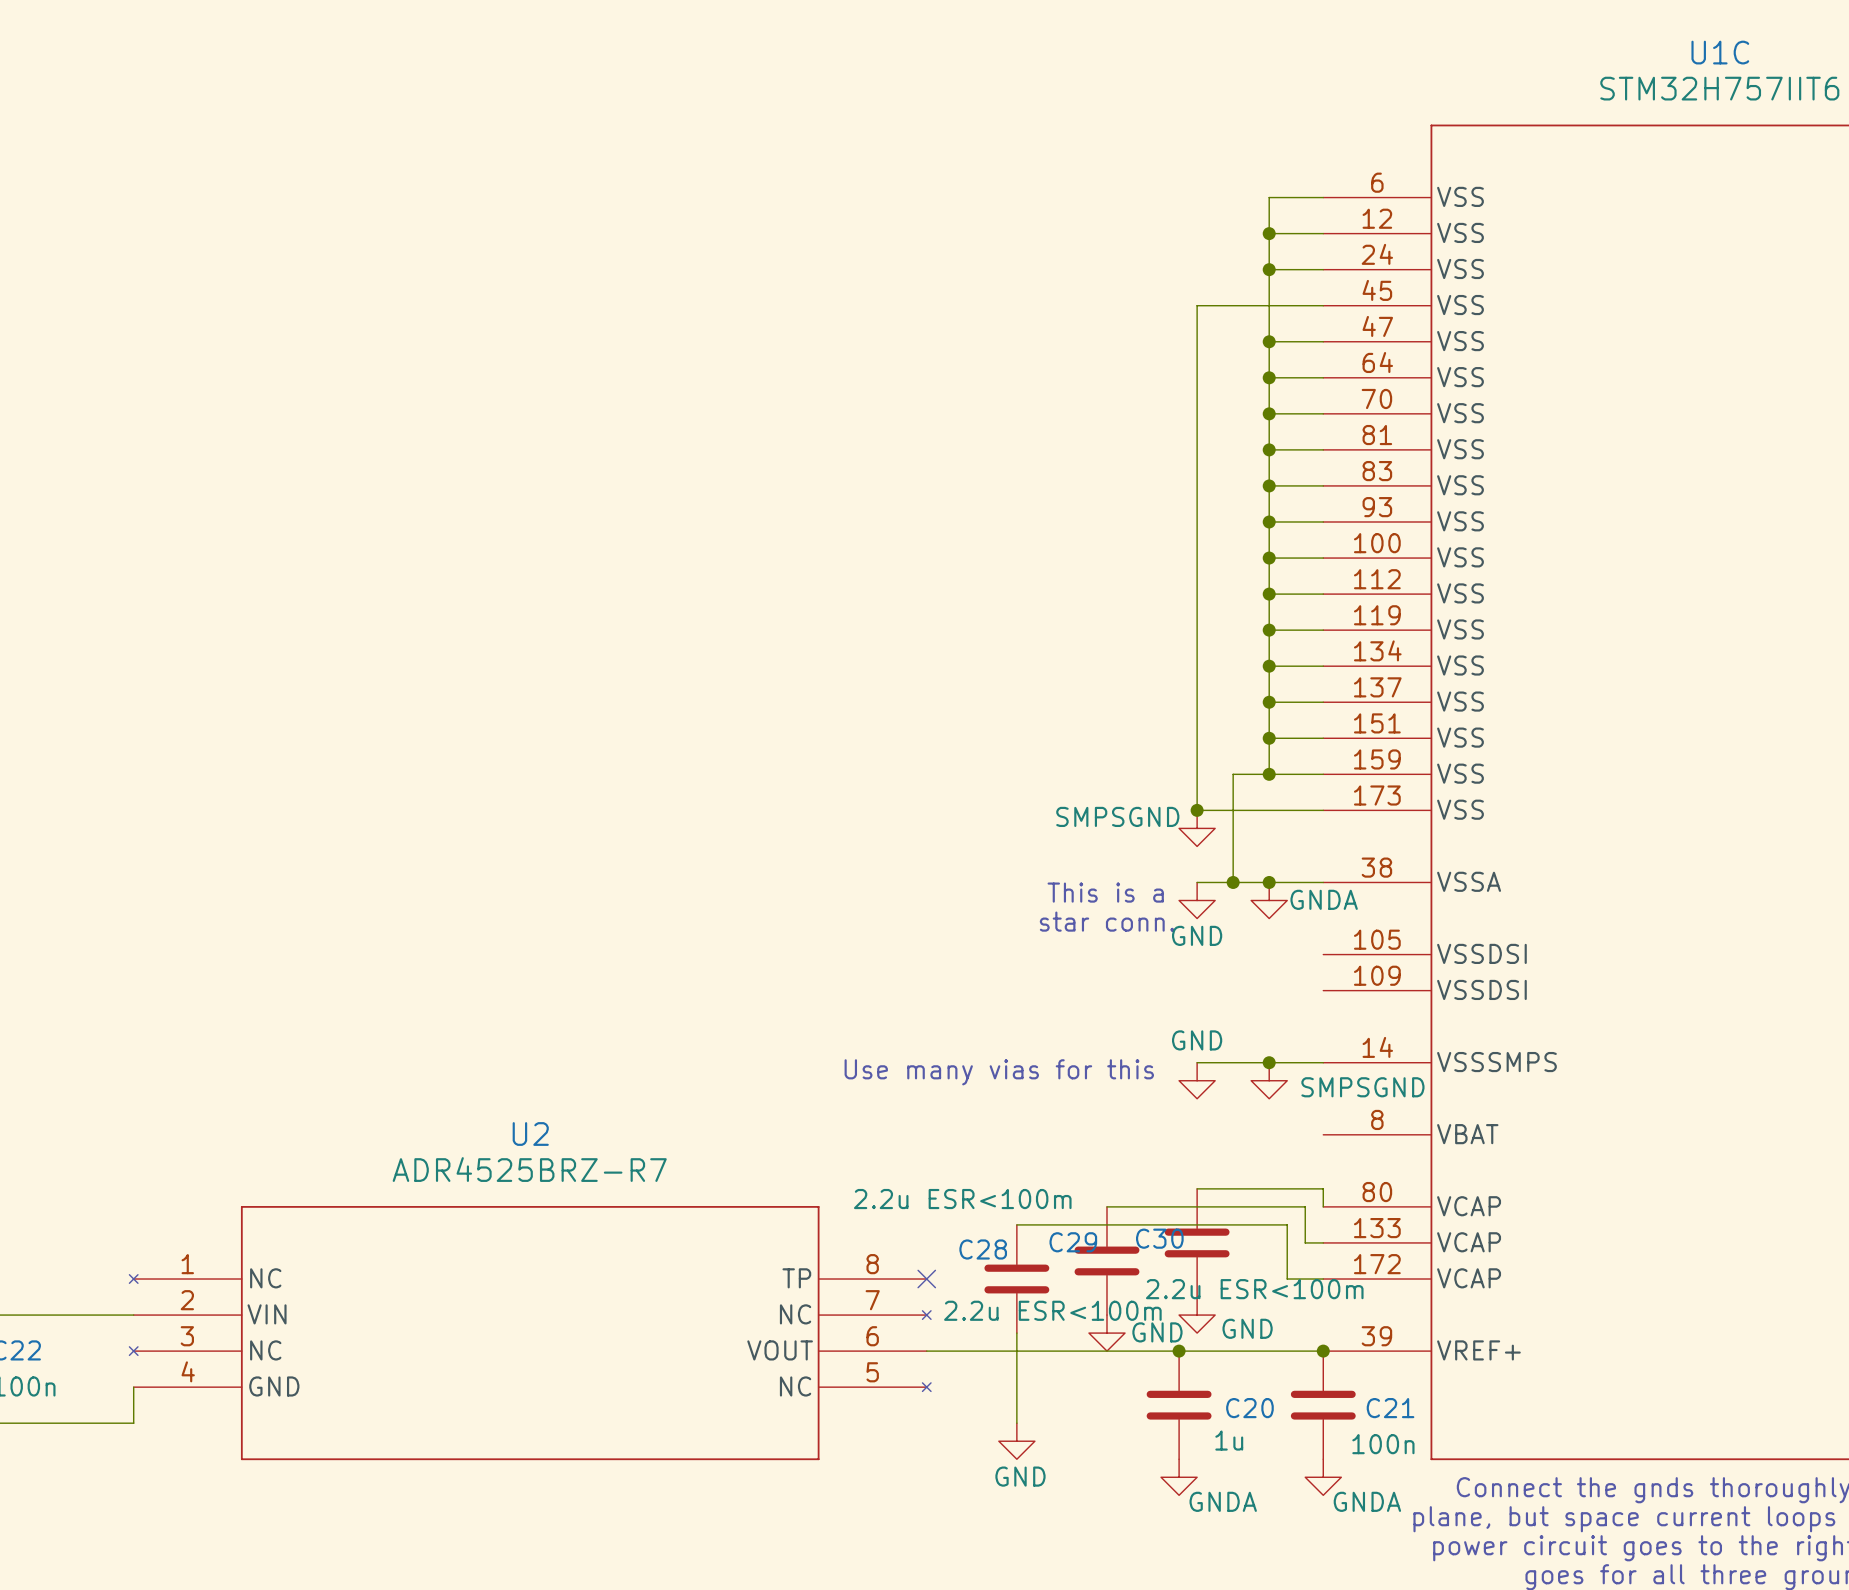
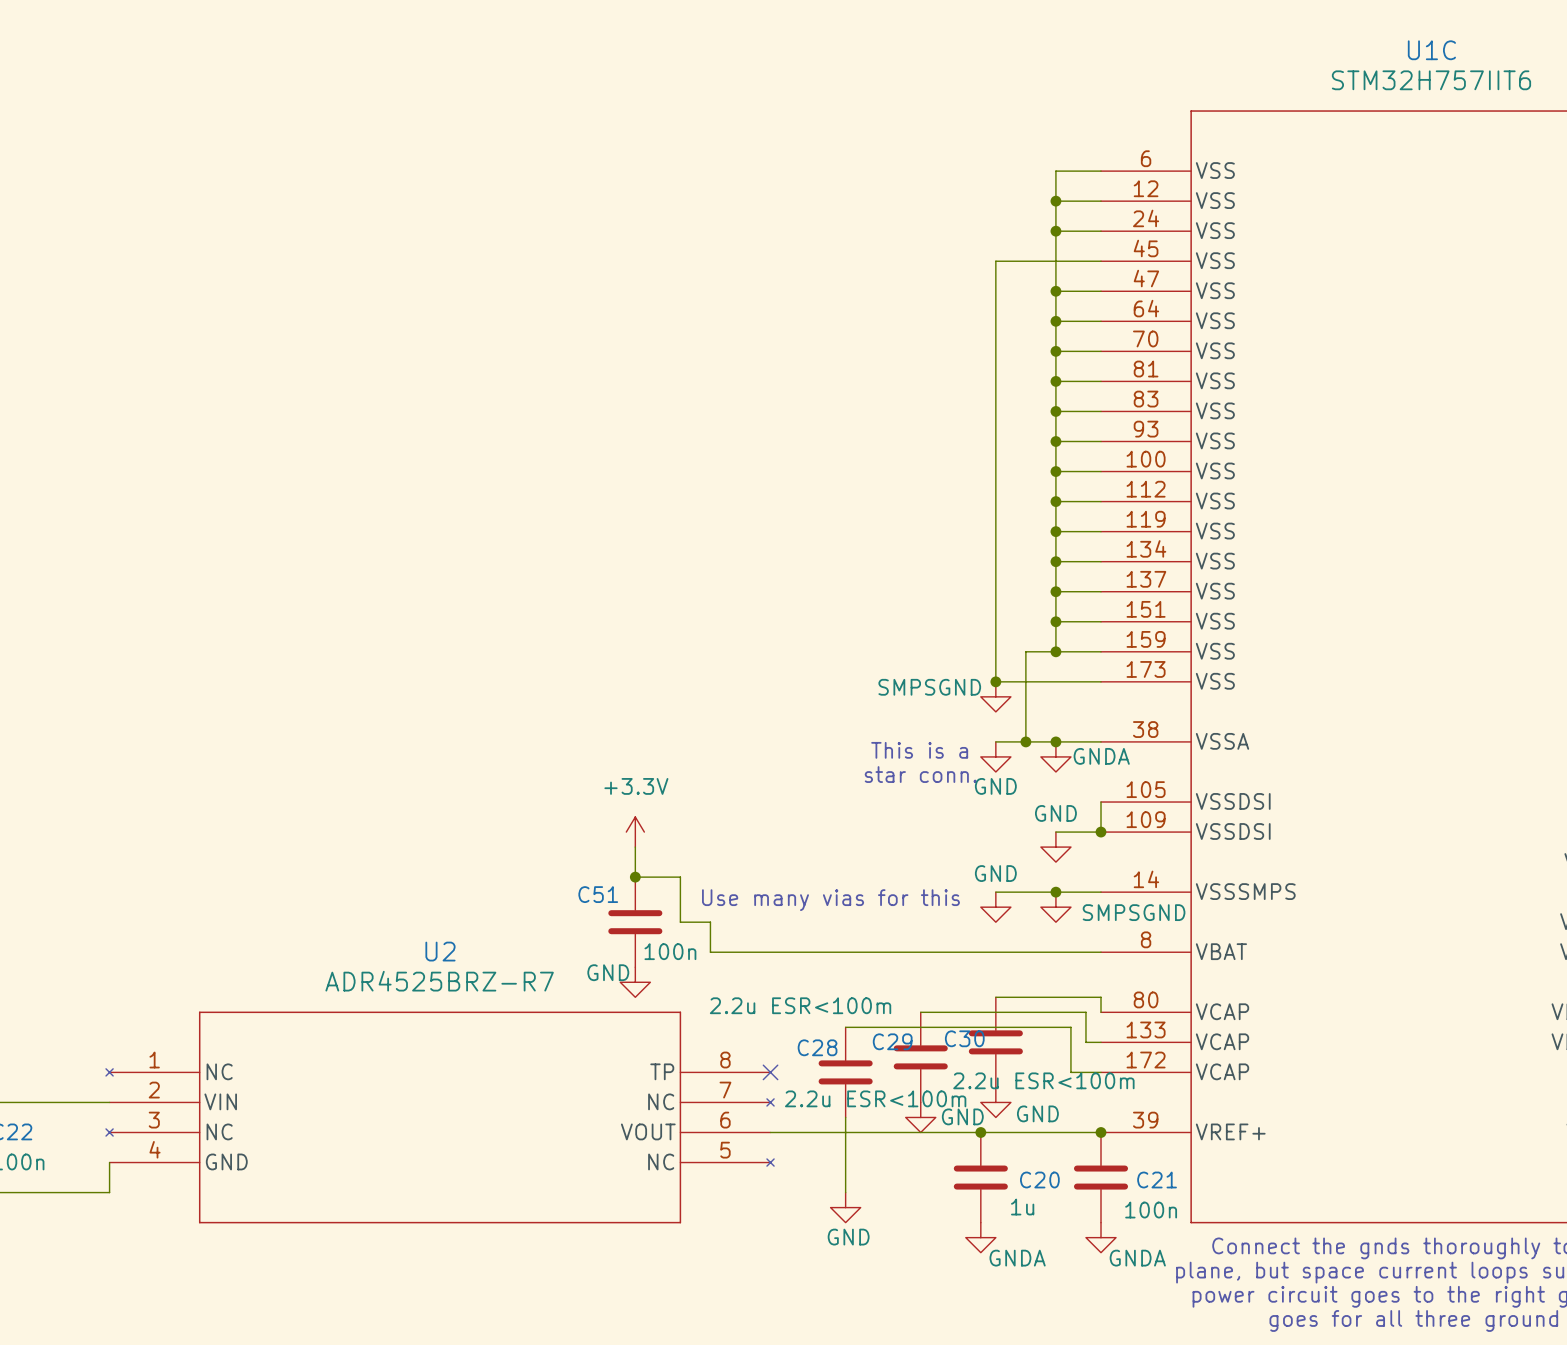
wire: none -> (1101, 802) (1101, 832) (1055, 832)
power symbol: none -> +3.3V (635, 832)
junction: none -> (1101, 832)
wire: none -> (635, 847) (635, 877) (680, 877) (680, 922) (710, 922) (710, 952) (1101, 952)
power symbol: none -> GND (1055, 847)
junction: none -> (635, 877)
C51: none -> 100n (635, 922)
power symbol: none -> GND (635, 982)

